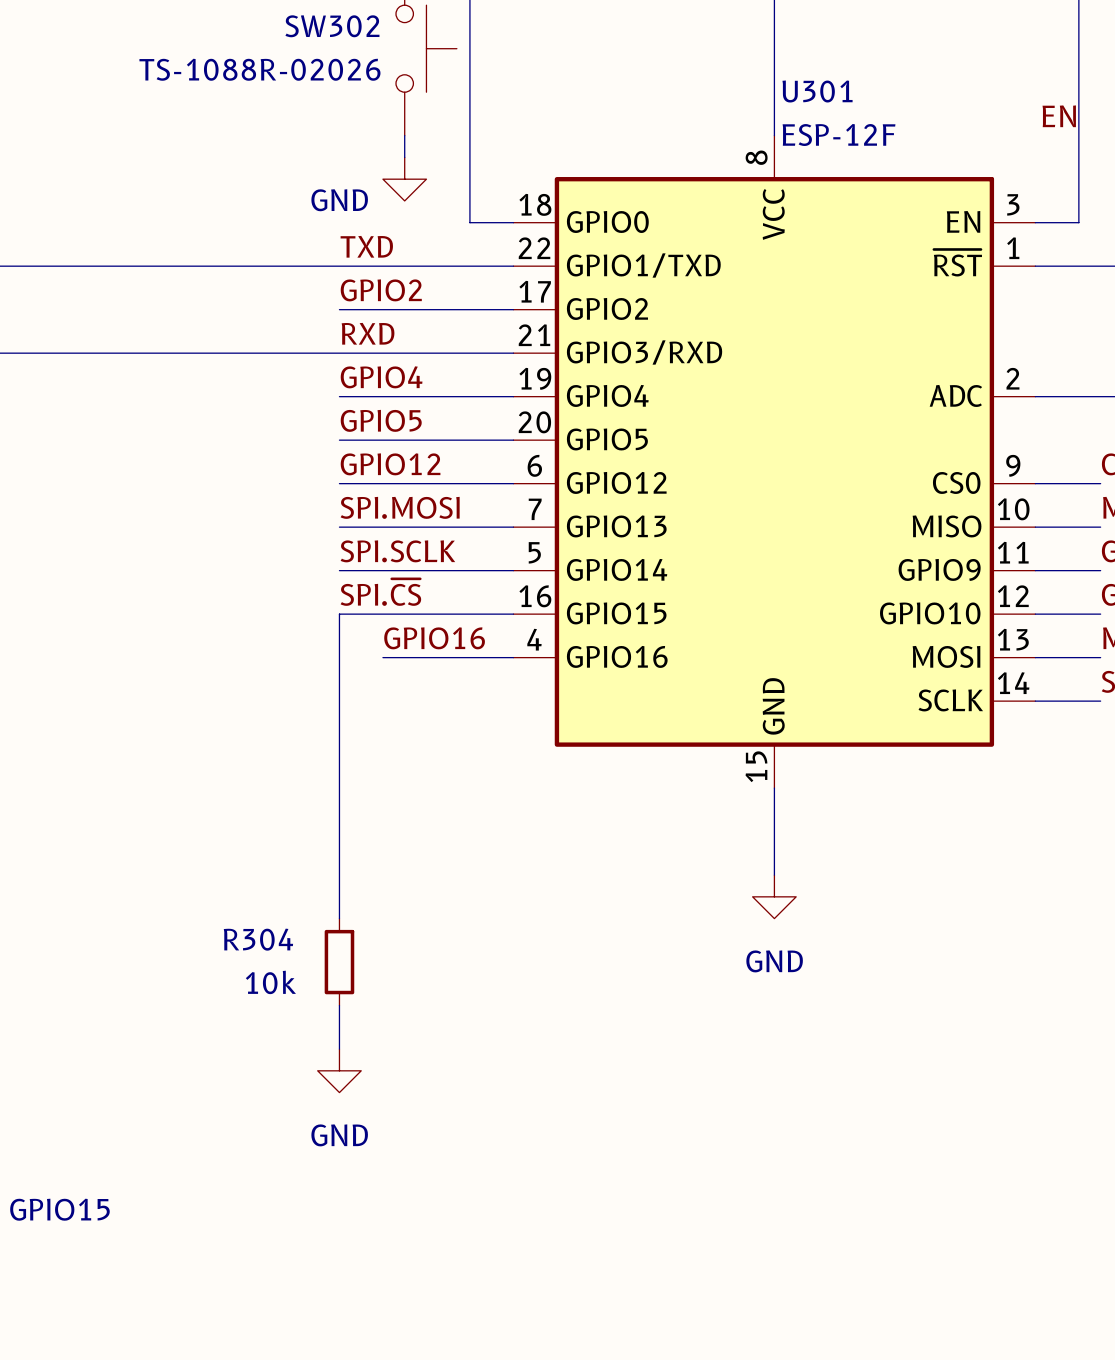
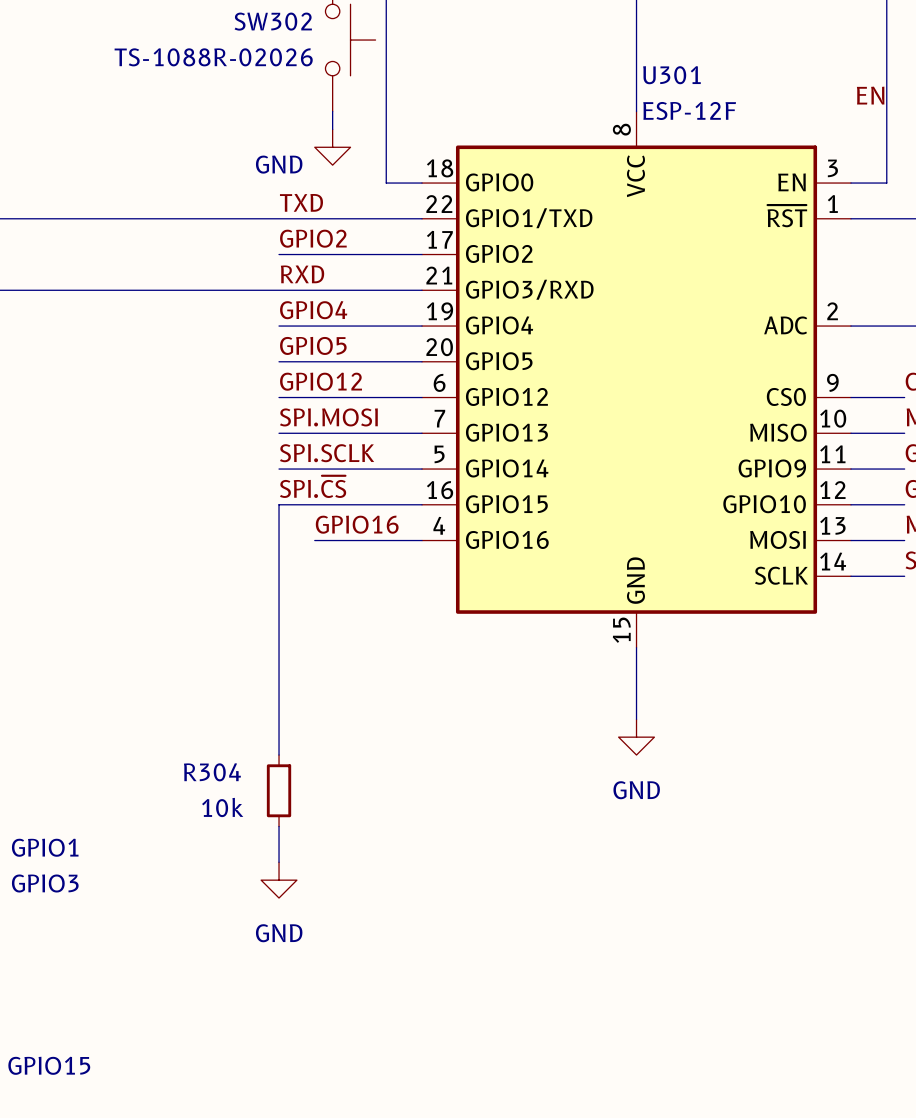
text: none -> GPIO1 (45, 847)
text: none -> GPIO3 (45, 883)
text position: GPIO15 (59, 1209) -> GPIO15 (49, 1065)

